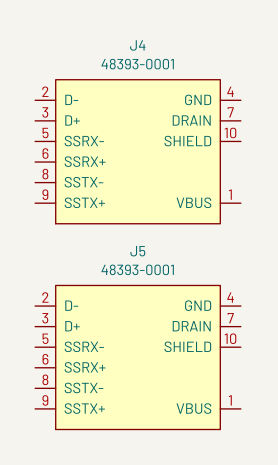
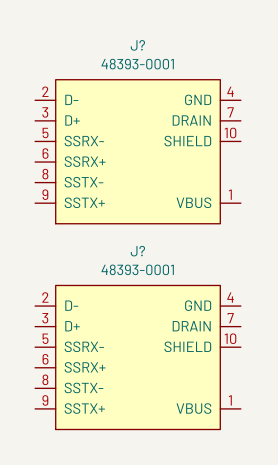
J4 name: J4 (137, 45) -> J? (137, 45)
J5 name: J5 (137, 251) -> J? (137, 251)

